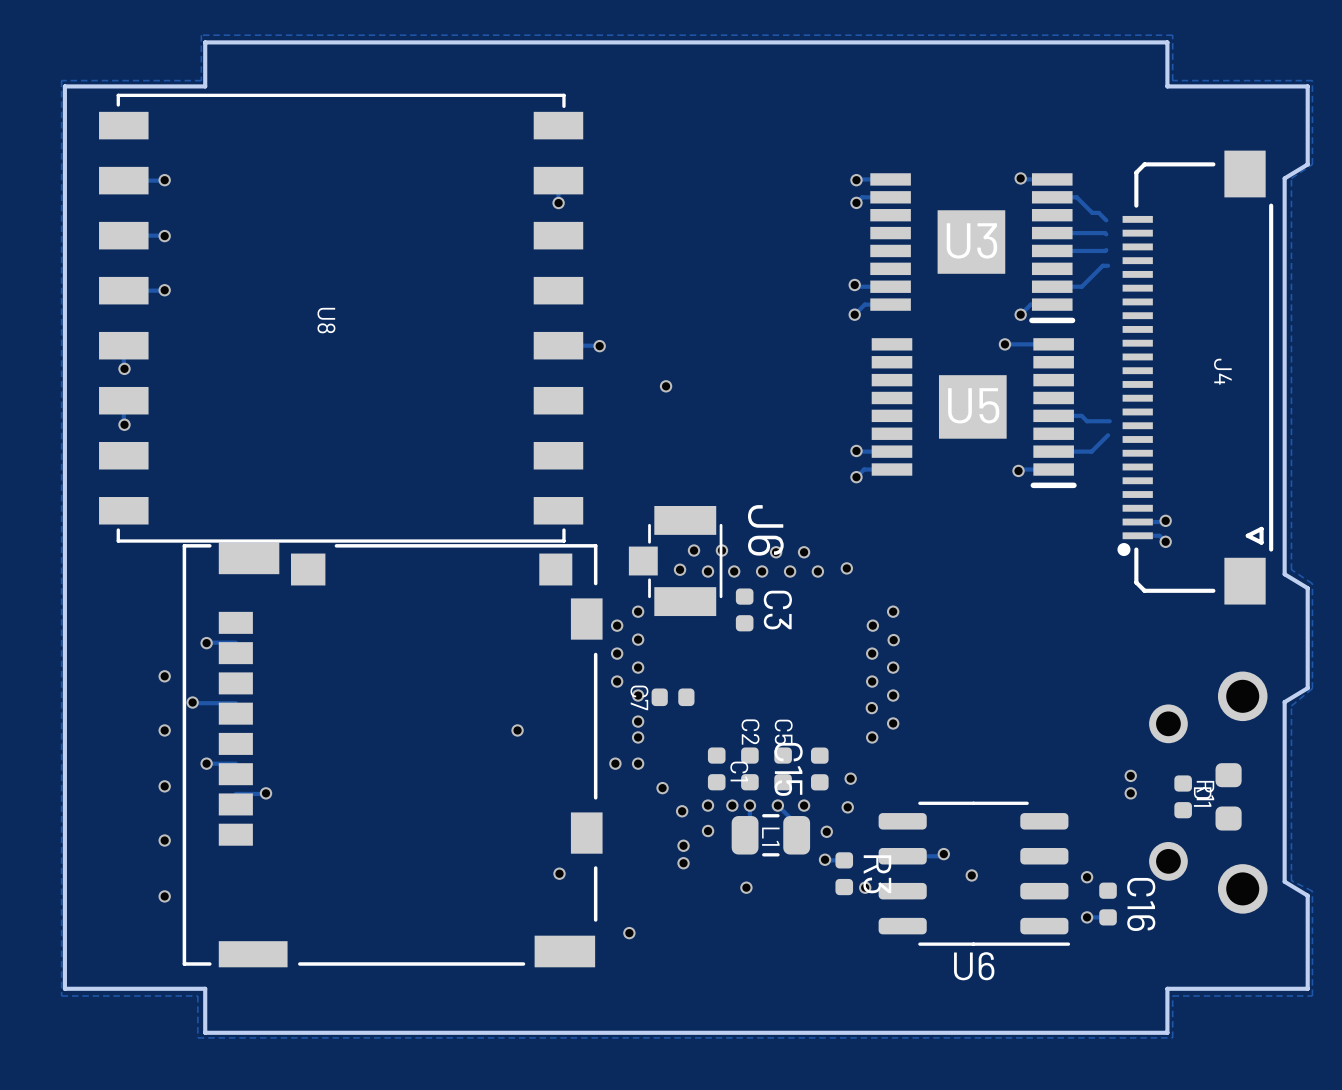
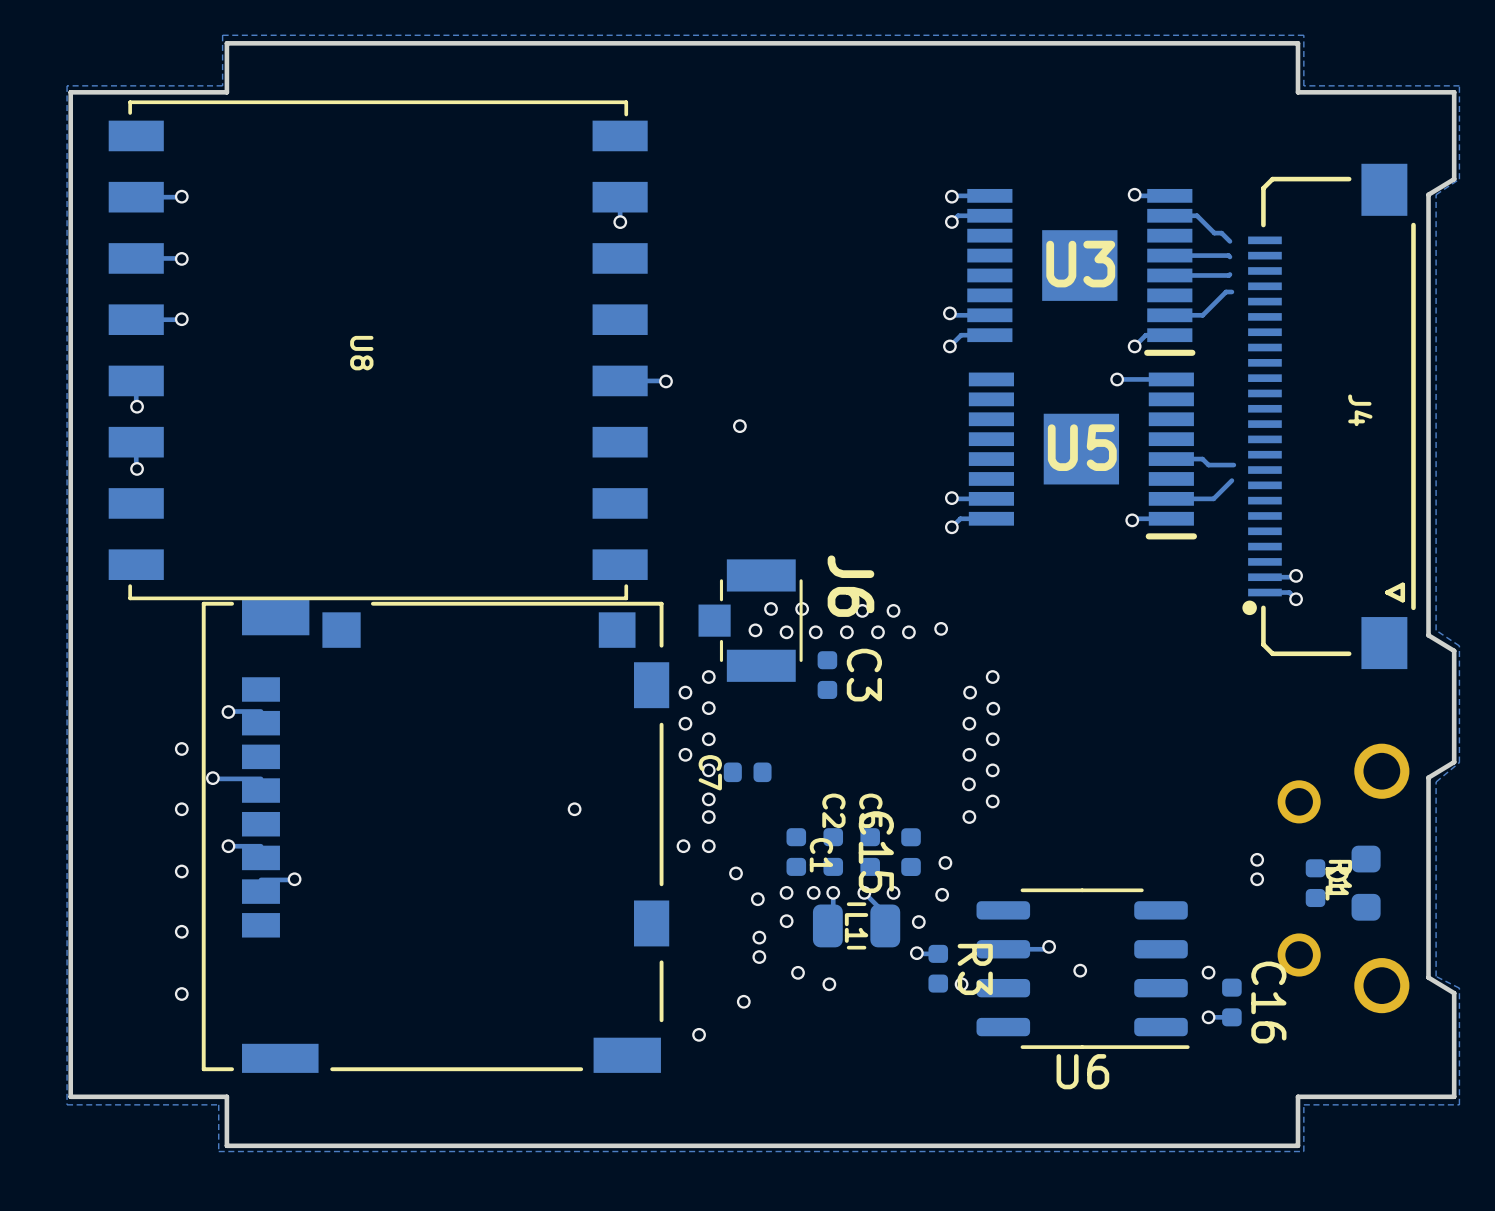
via: (559, 873) -> none
via: none -> (798, 972)
via: none -> (743, 1001)

